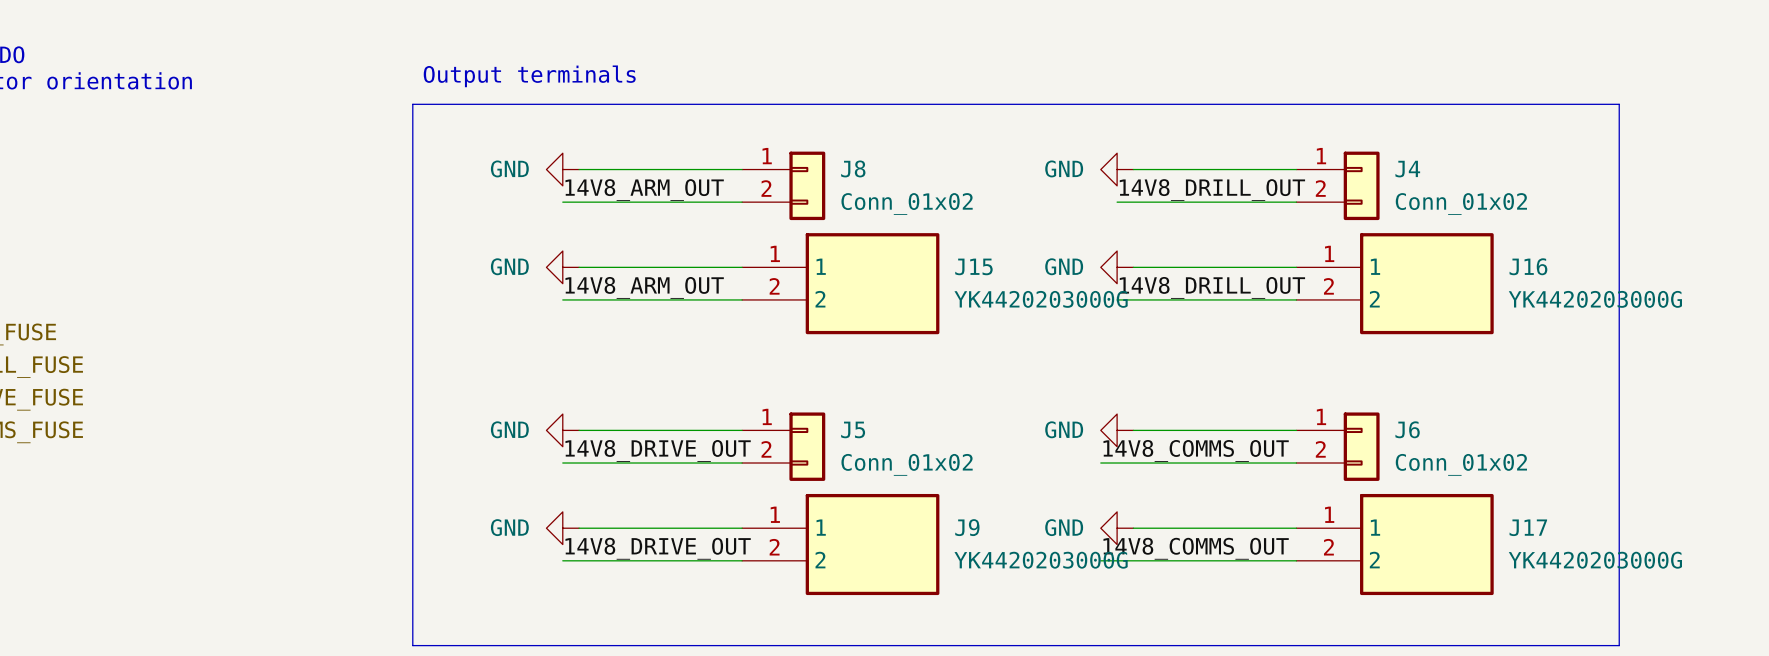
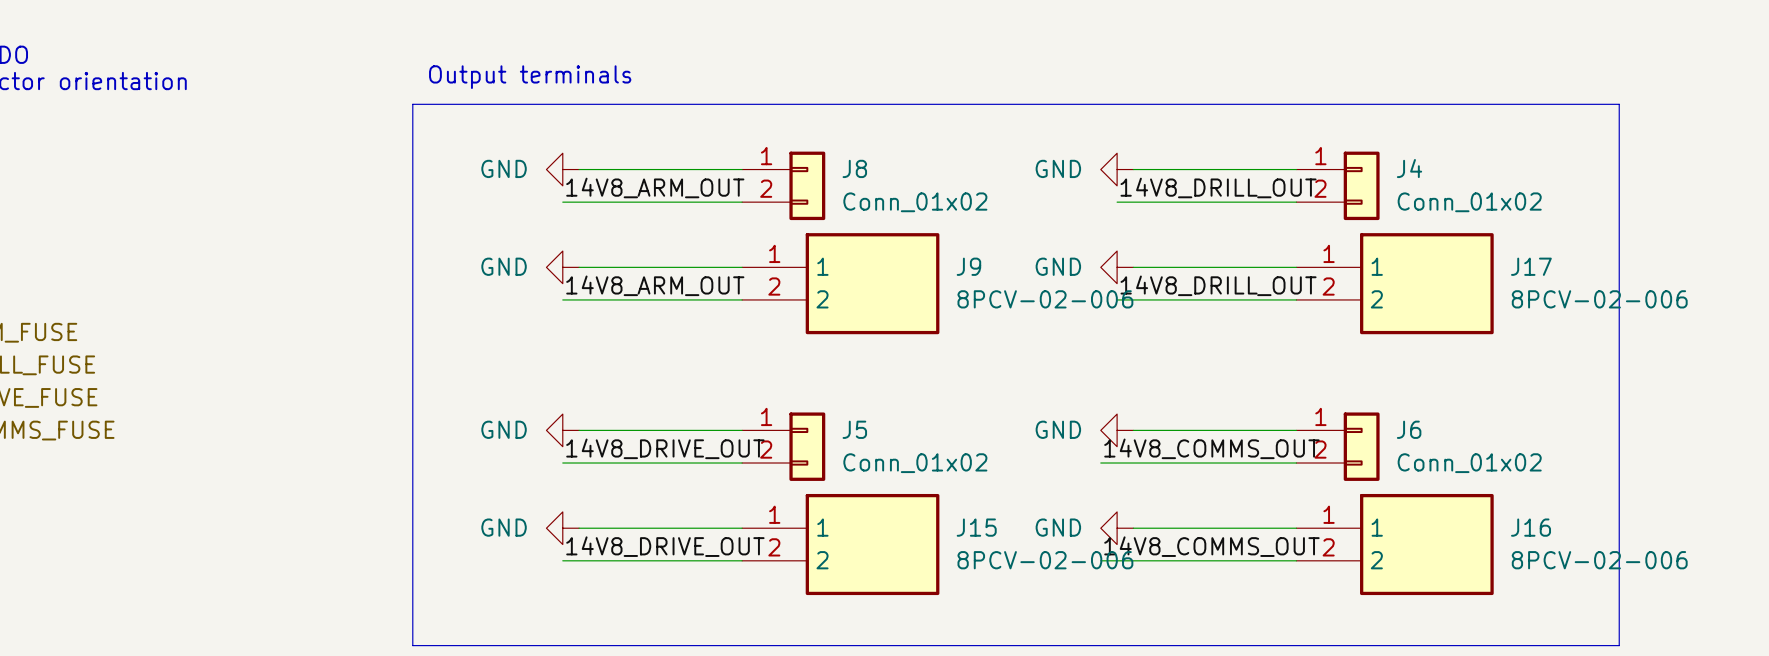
J15 name: J15 (973, 266) -> J9 (968, 266)
J16 name: J16 (1528, 266) -> J17 (1531, 266)
J15 value: YK4420203000G (1041, 299) -> 8PCV-02-006 (1045, 299)
J16 value: YK4420203000G (1595, 299) -> 8PCV-02-006 (1599, 299)
J9 name: J9 (967, 527) -> J15 (976, 527)
J17 name: J17 (1528, 527) -> J16 (1531, 527)
J9 value: YK4420203000G (1041, 560) -> 8PCV-02-006 (1045, 560)
J17 value: YK4420203000G (1595, 560) -> 8PCV-02-006 (1599, 560)

